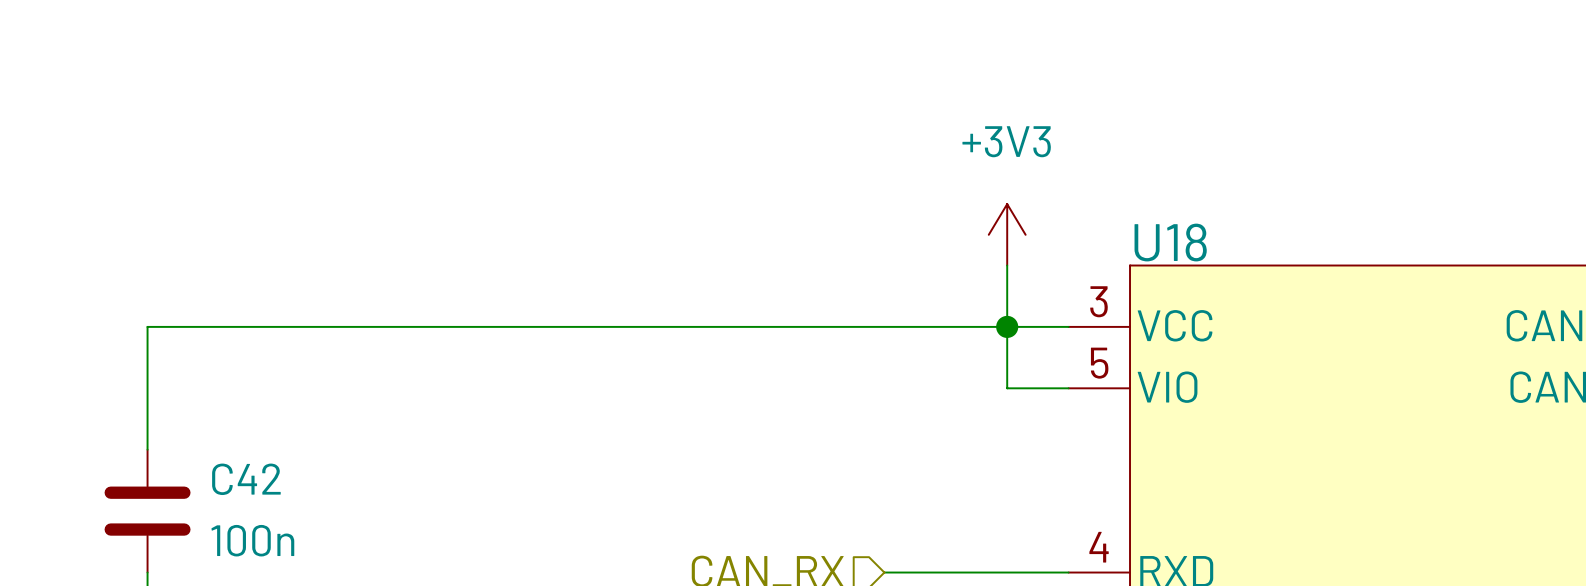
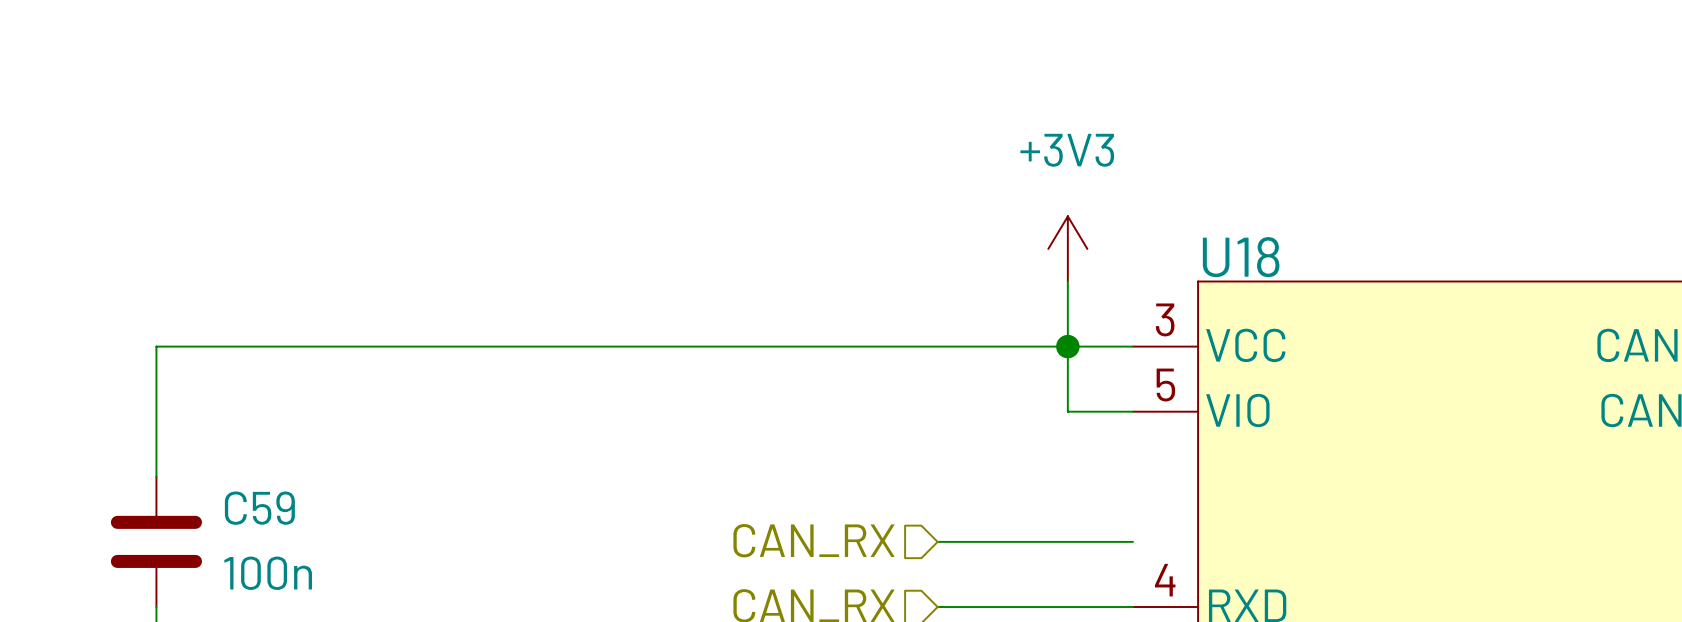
C42 name: C42 (246, 479) -> C59 (259, 508)
hierarchical label: none -> CAN_RX (813, 540)
wire: none -> (937, 541) (1132, 541)

